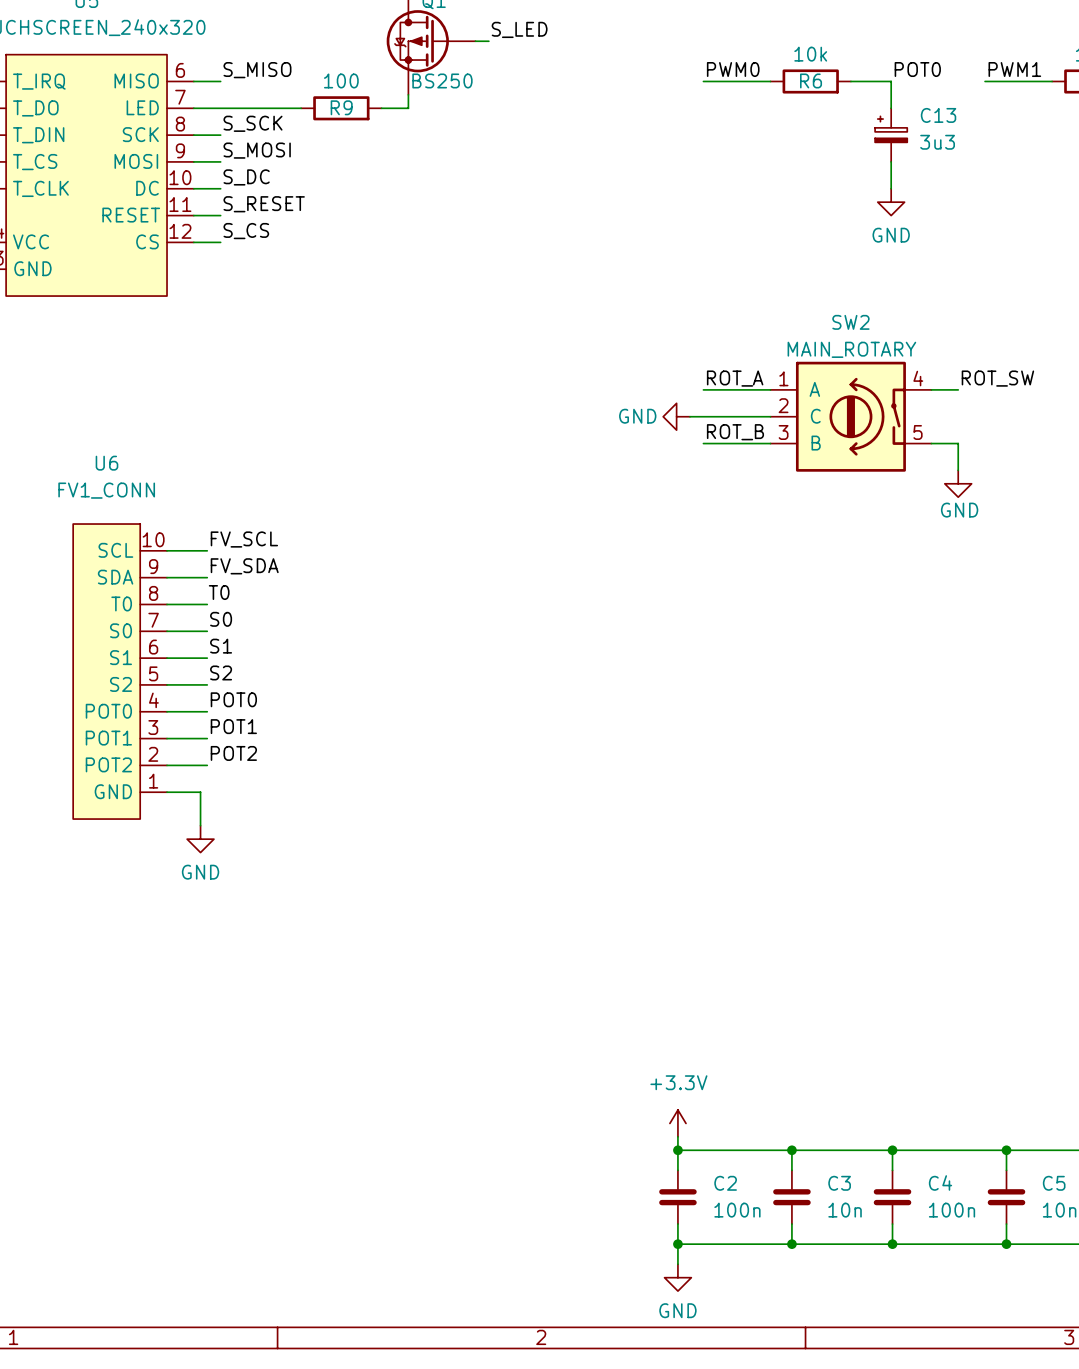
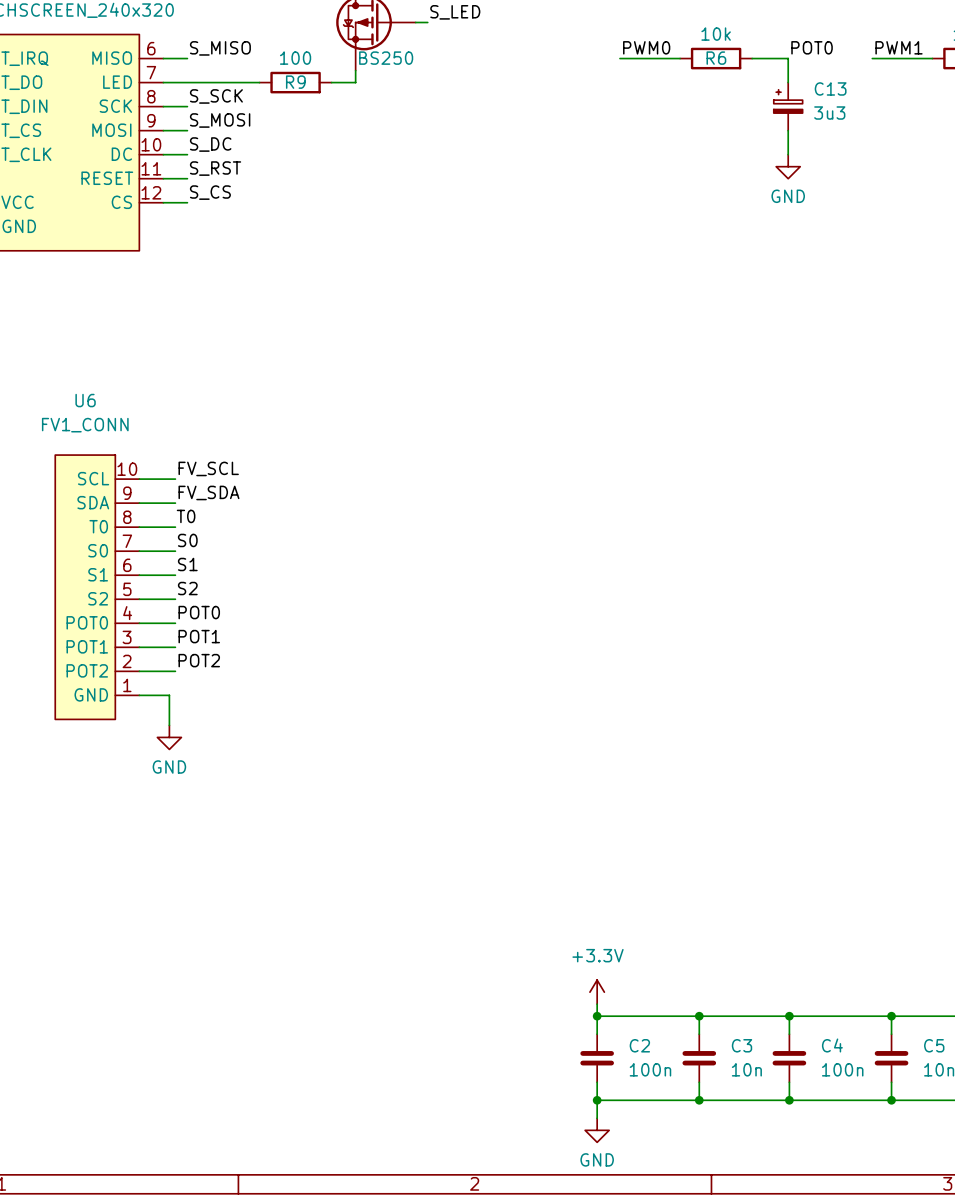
label: S_RESET (264, 204) -> S_RST (215, 168)
label: ROT_A (735, 378) -> none
label: ROT_SW (997, 378) -> none
wire: (703, 389) (770, 389) -> none
wire: (931, 389) (958, 389) -> none
power symbol: GND (676, 416) -> none
wire: (690, 416) (770, 416) -> none
SW2: MAIN_ROTARY (850, 416) -> none
label: ROT_B (735, 432) -> none
wire: (703, 443) (770, 443) -> none
wire: (931, 443) (958, 443) (958, 470) -> none
power symbol: GND (958, 483) -> none

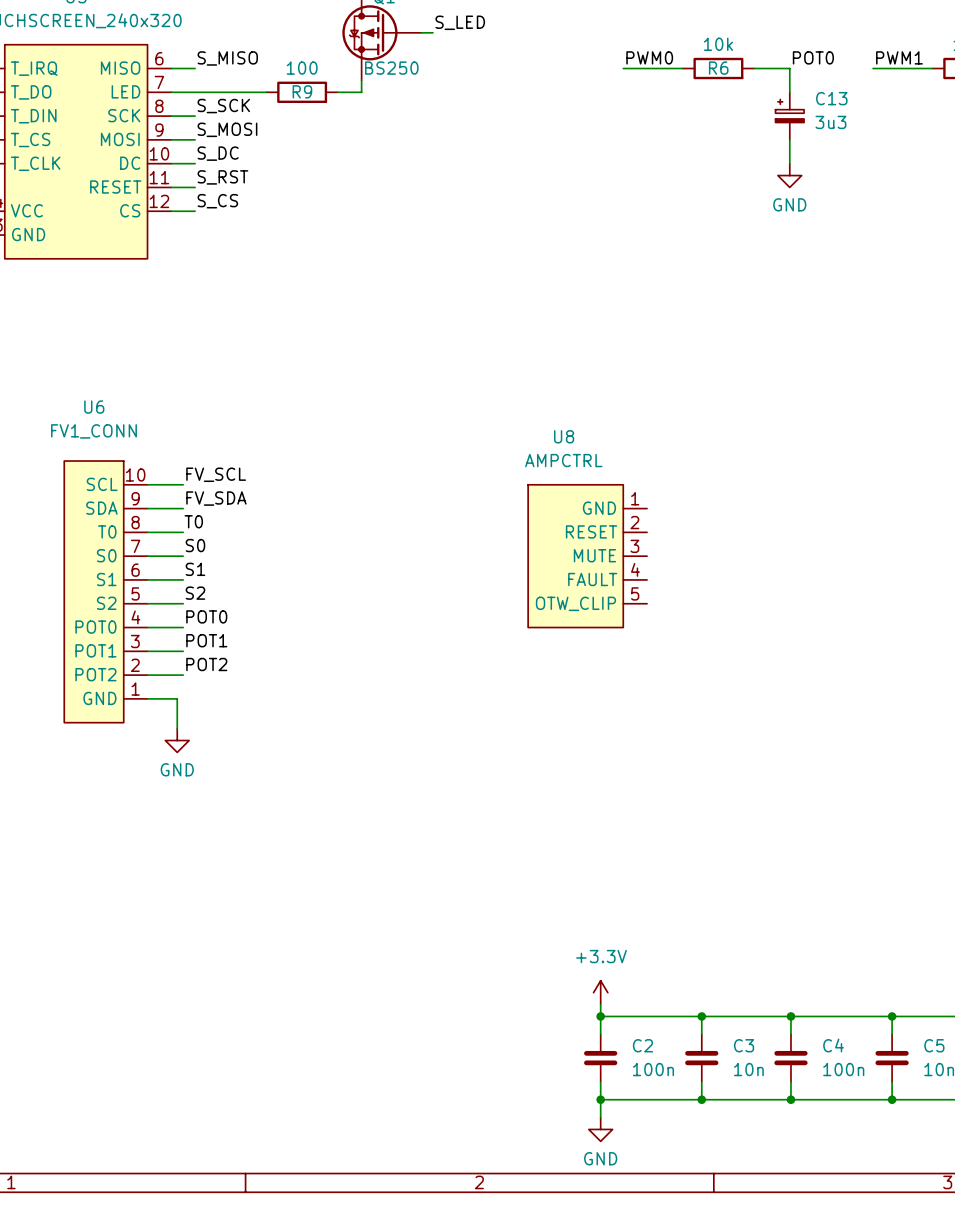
U8: none -> AMPCTRL (587, 556)

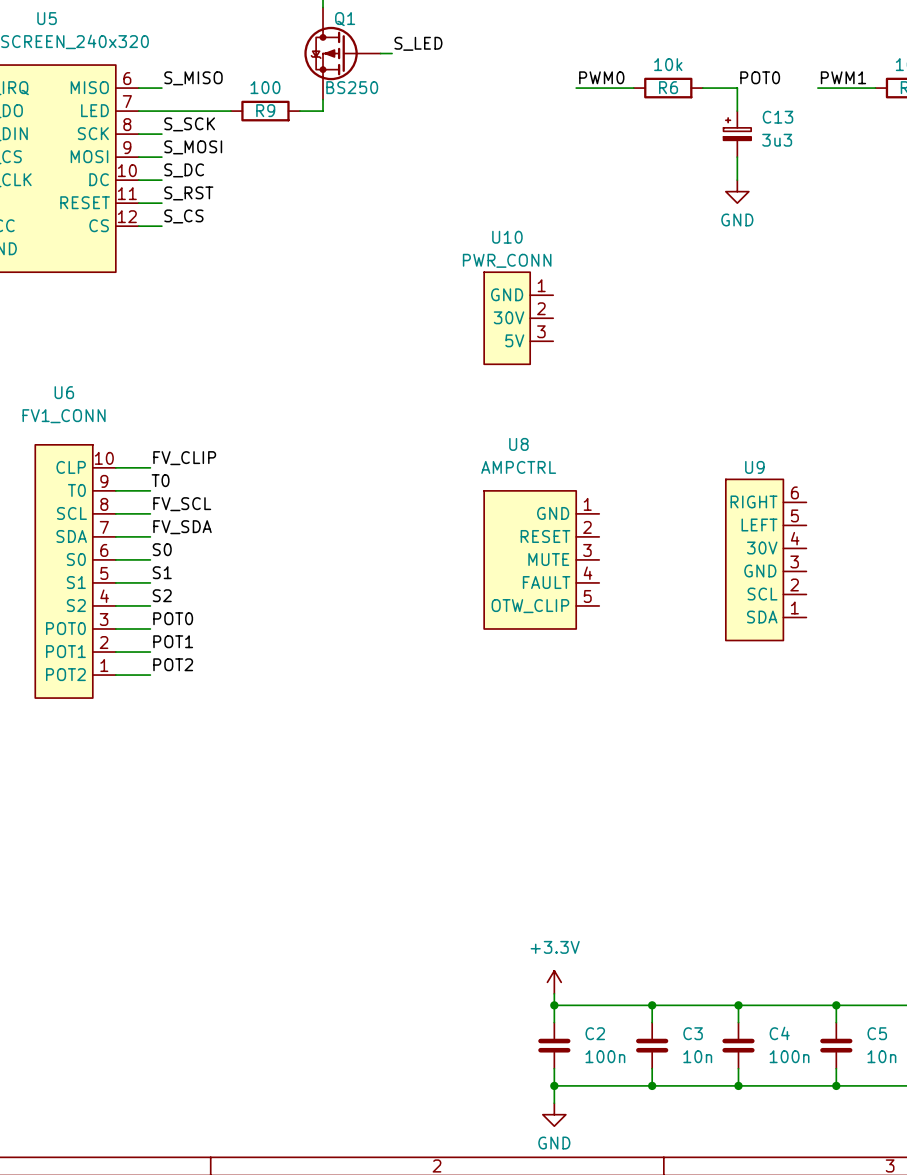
U10: none -> PWR_CONN (518, 318)
label: none -> FV_CLIP (184, 458)
U6 symbol: [64, 461, 148, 723] -> [35, 444, 116, 699]
wire: none -> (115, 467) (150, 467)
label: FV_SCL (216, 474) -> T0 (160, 480)
label: FV_SDA (216, 498) -> FV_SCL (182, 504)
label: T0 (193, 521) -> FV_SDA (182, 527)
U9: none -> (766, 559)
wire: (147, 698) (177, 698) (177, 728) -> none
power symbol: GND (177, 740) -> none

